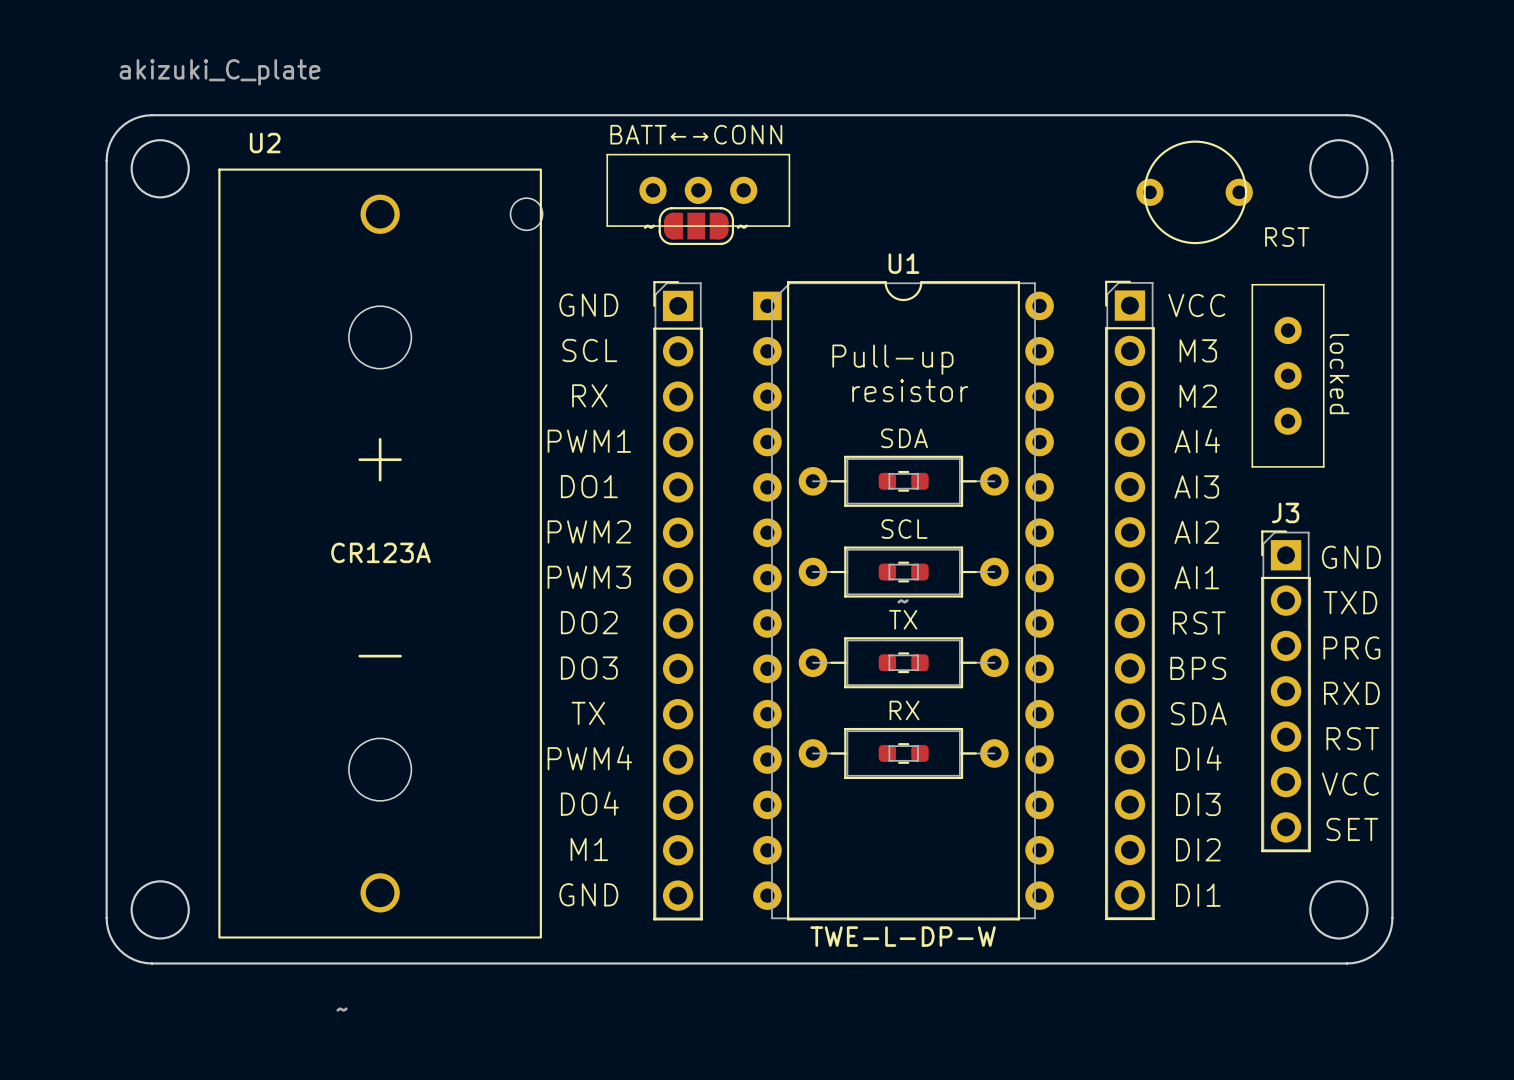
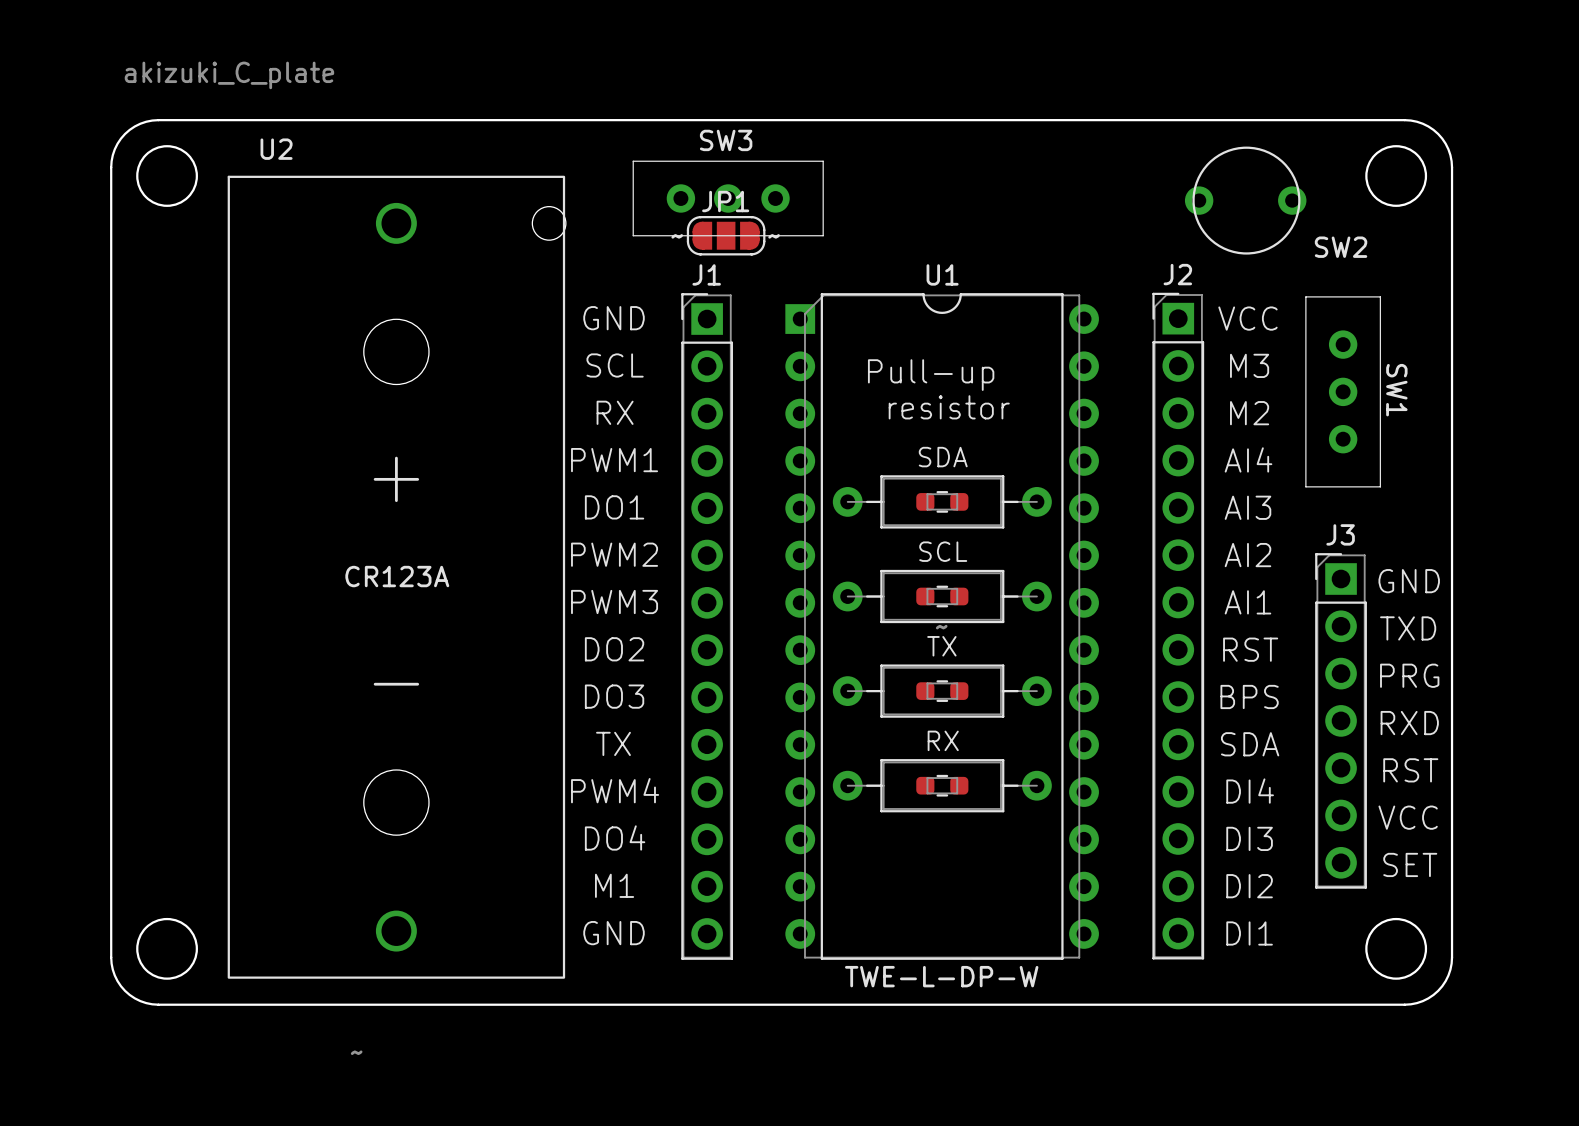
BATT←→CONN name: BATT←→CONN (696, 134) -> SW3 (726, 140)
JP1 name: none -> JP1 (725, 201)
RST name: RST (1287, 237) -> SW2 (1341, 247)
J1 name: none -> J1 (706, 274)
J2 name: none -> J2 (1177, 274)
locked name: locked (1339, 374) -> SW1 (1396, 390)

